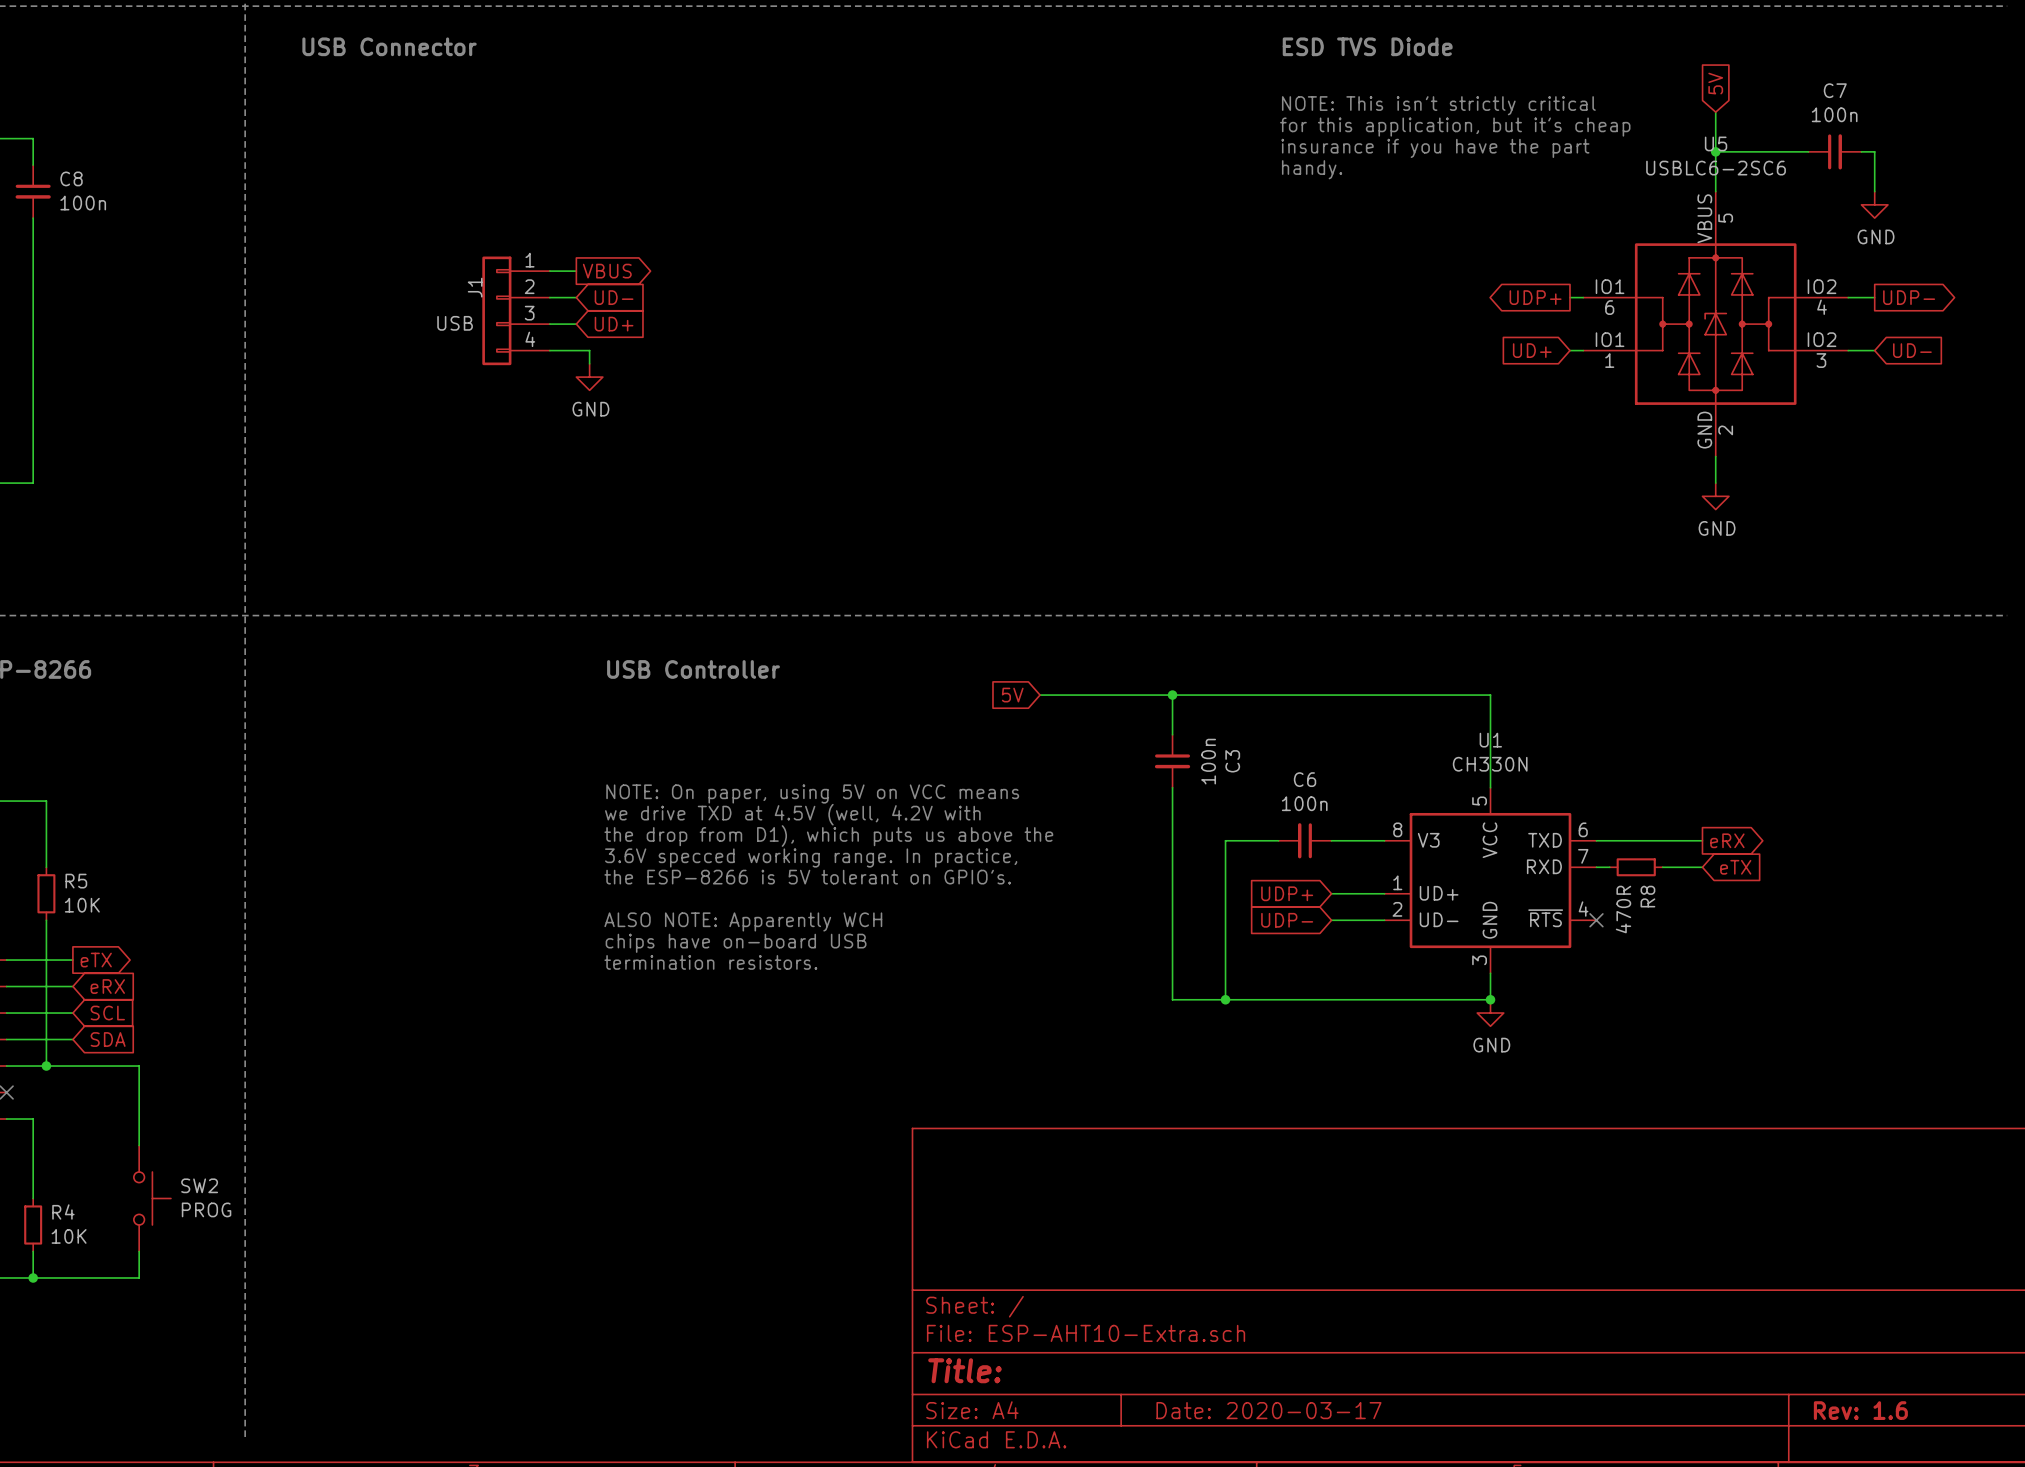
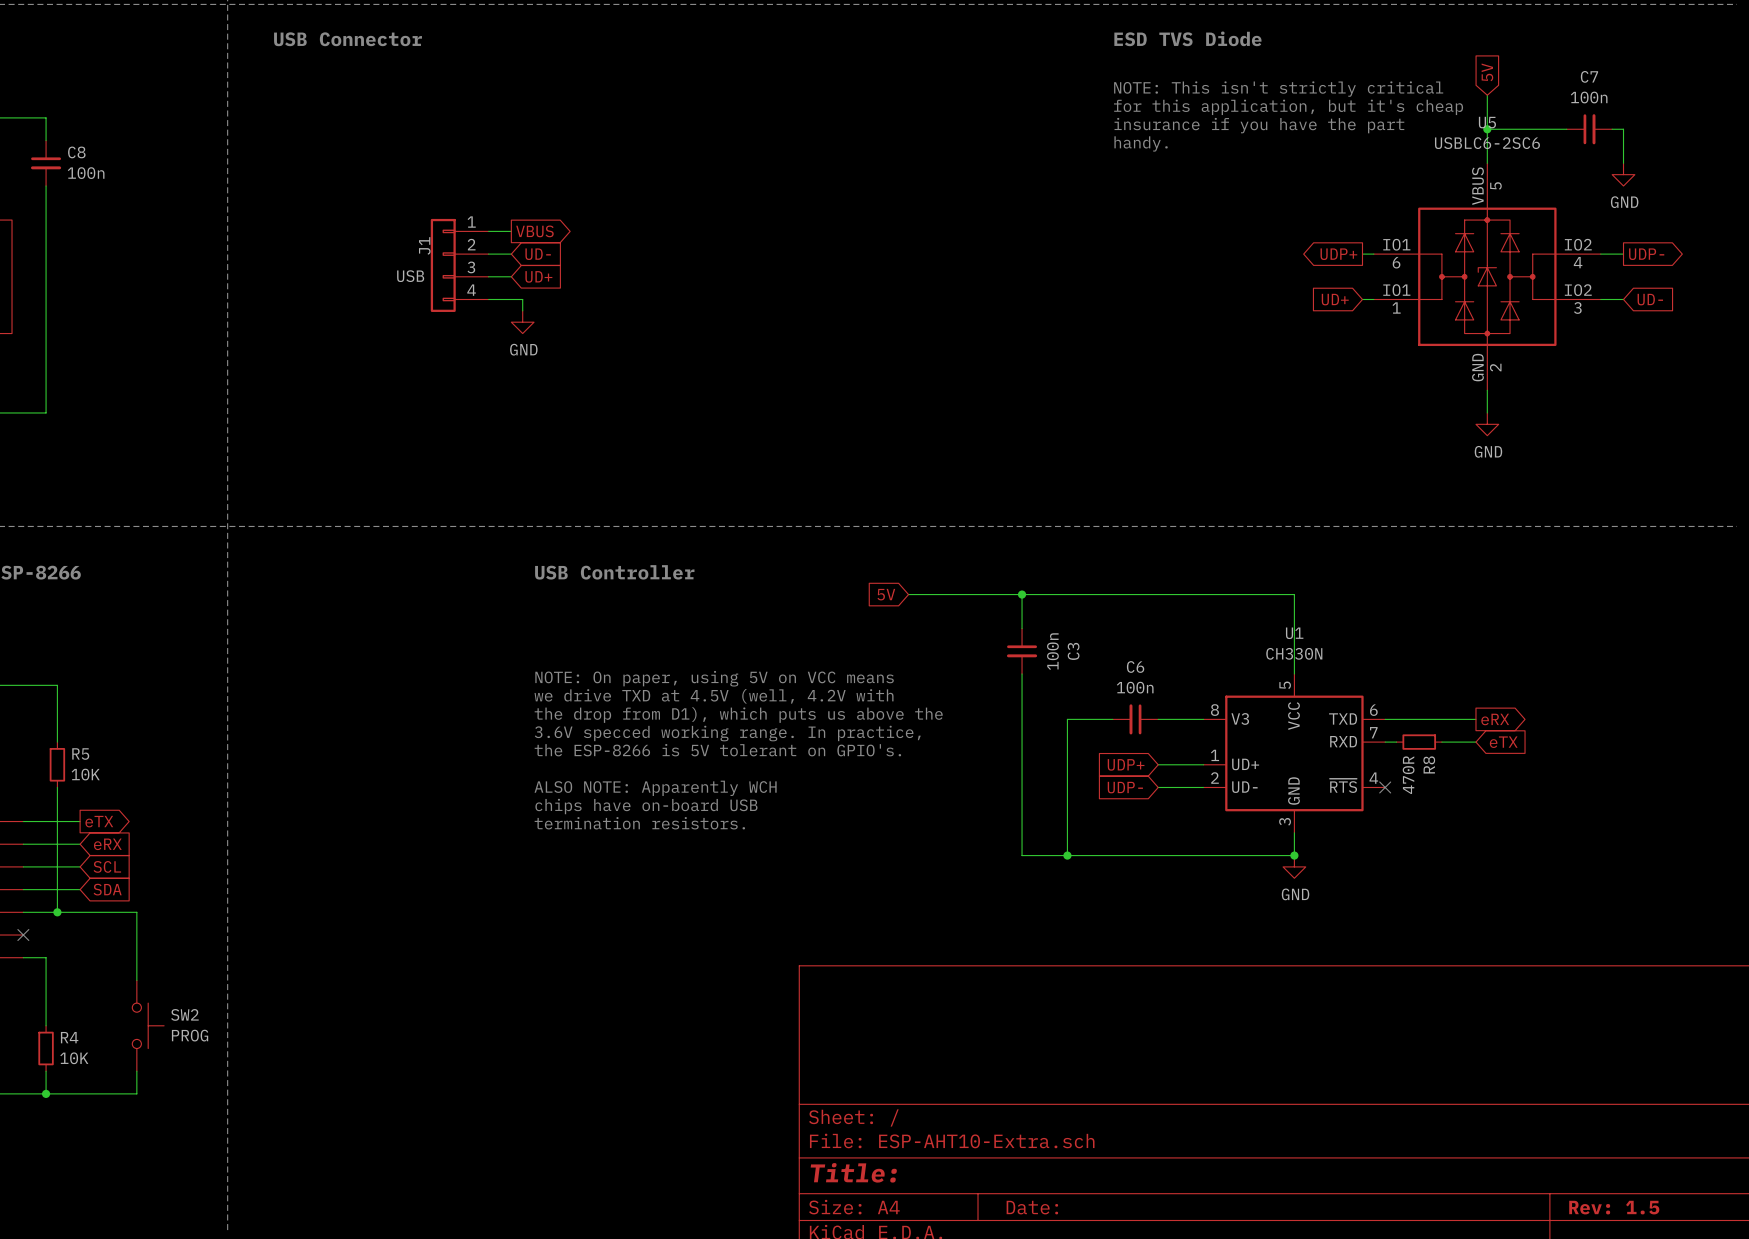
title block: Date: 2020-03-17 (1268, 1410) -> Date: (1032, 1207)
title block: Rev: 1.6 (1860, 1410) -> Rev: 1.5 (1614, 1207)

